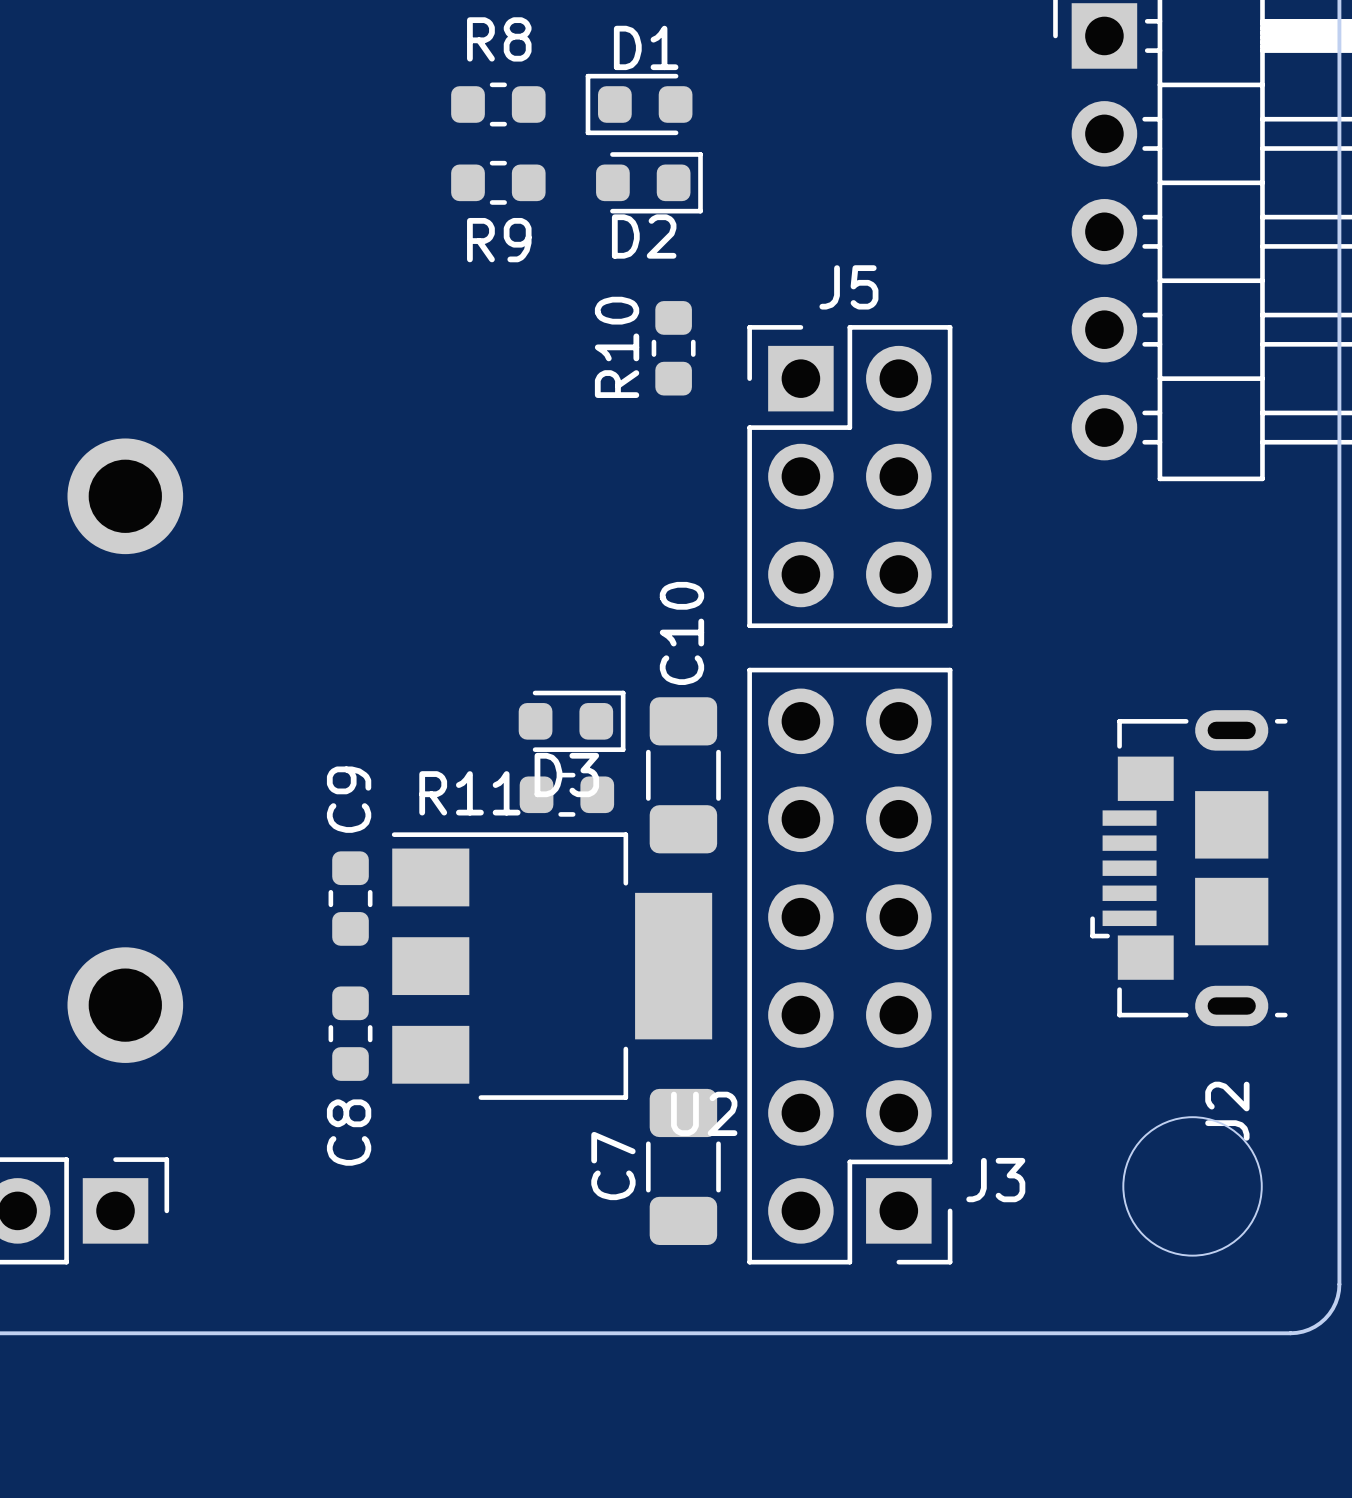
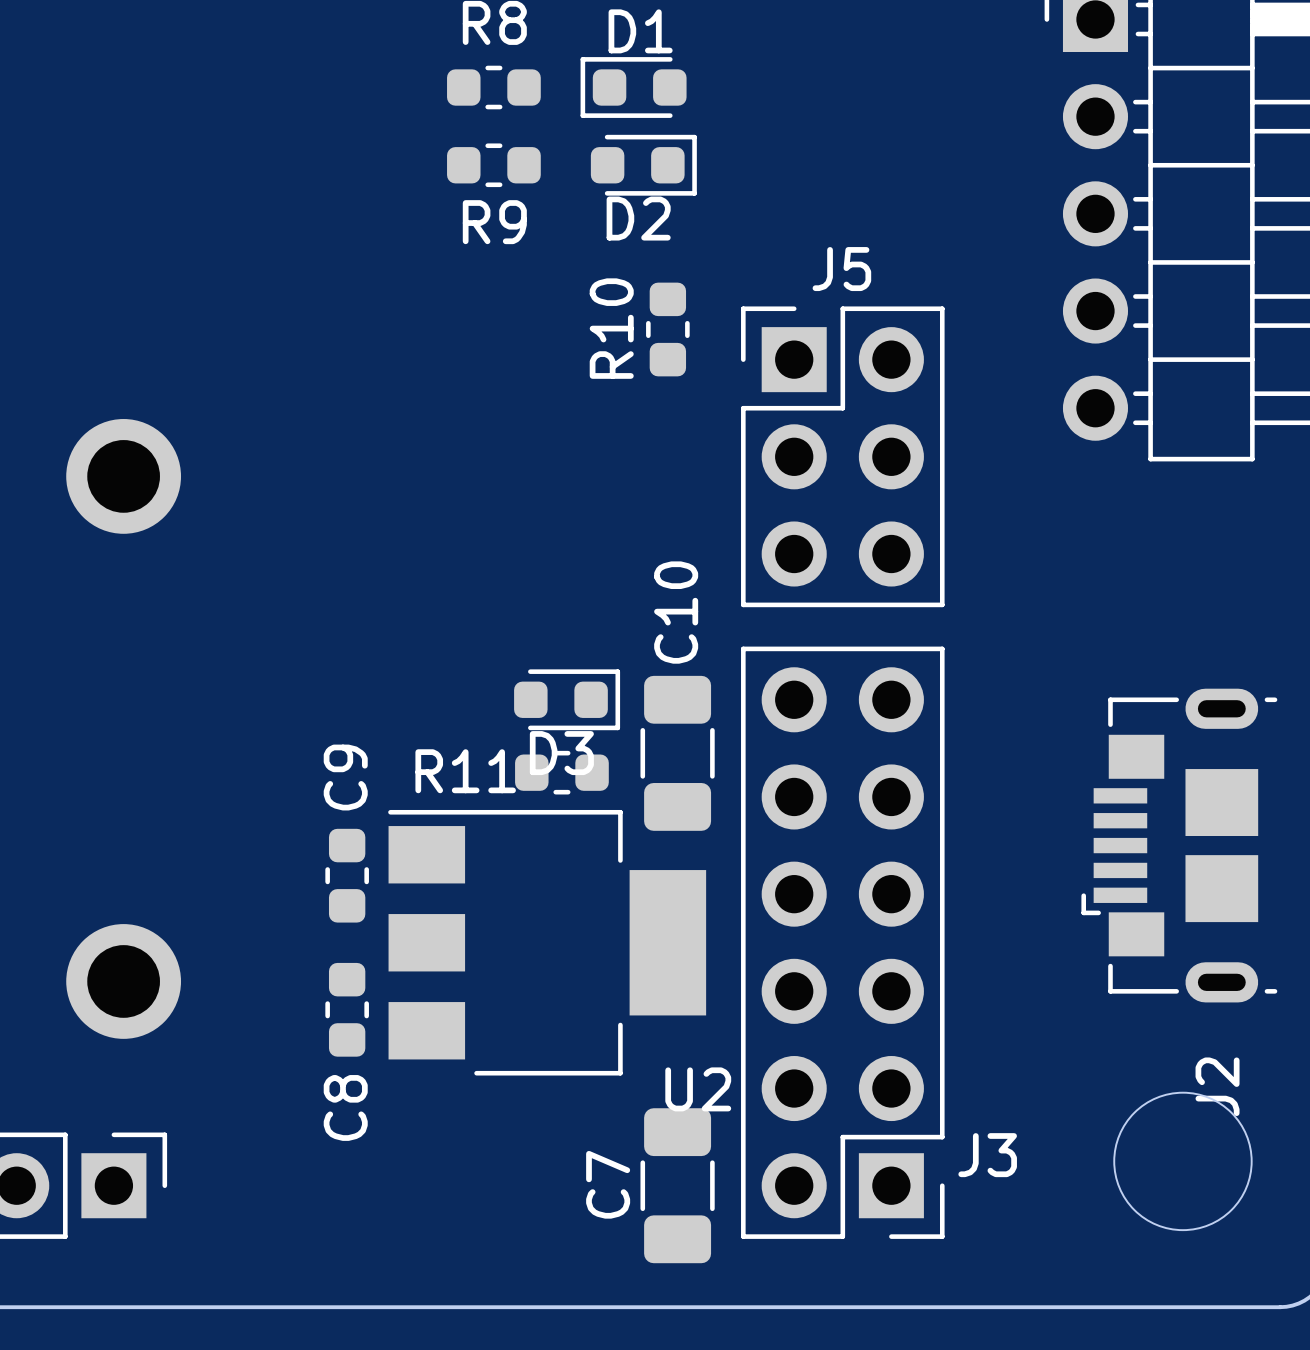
C7 position: (683, 1166) -> (677, 1185)

